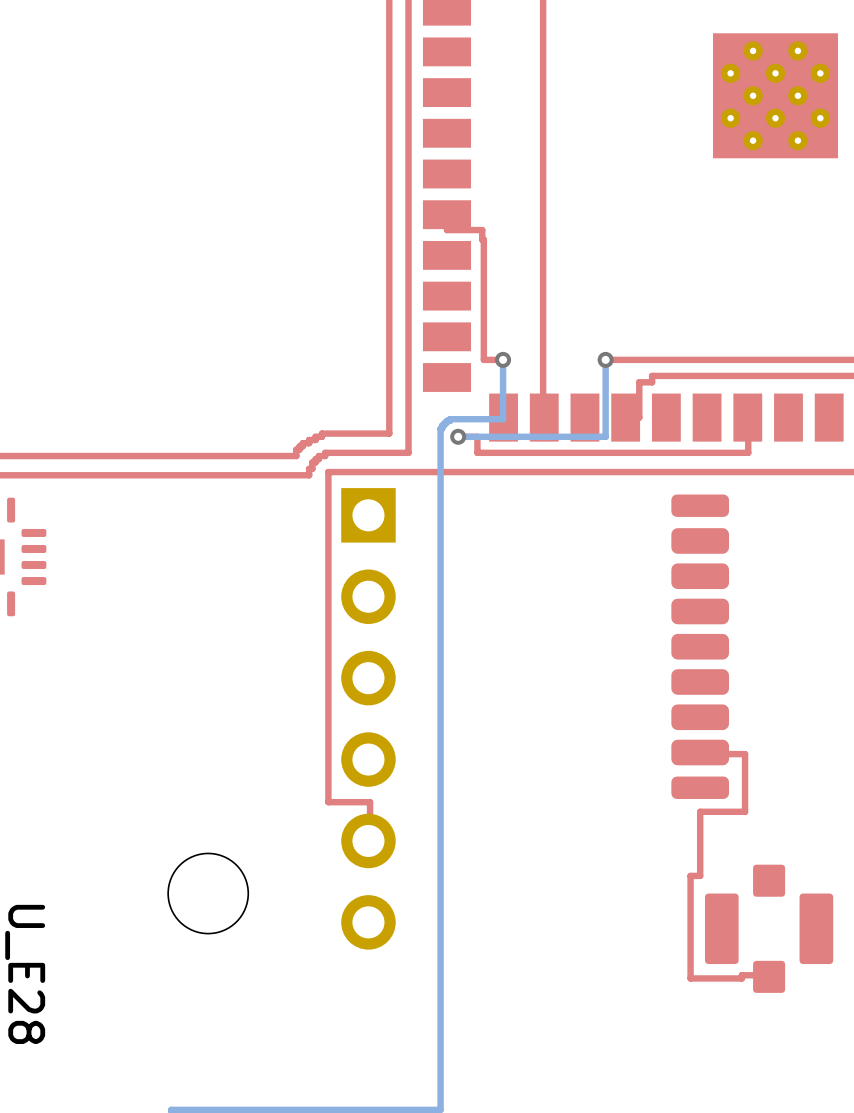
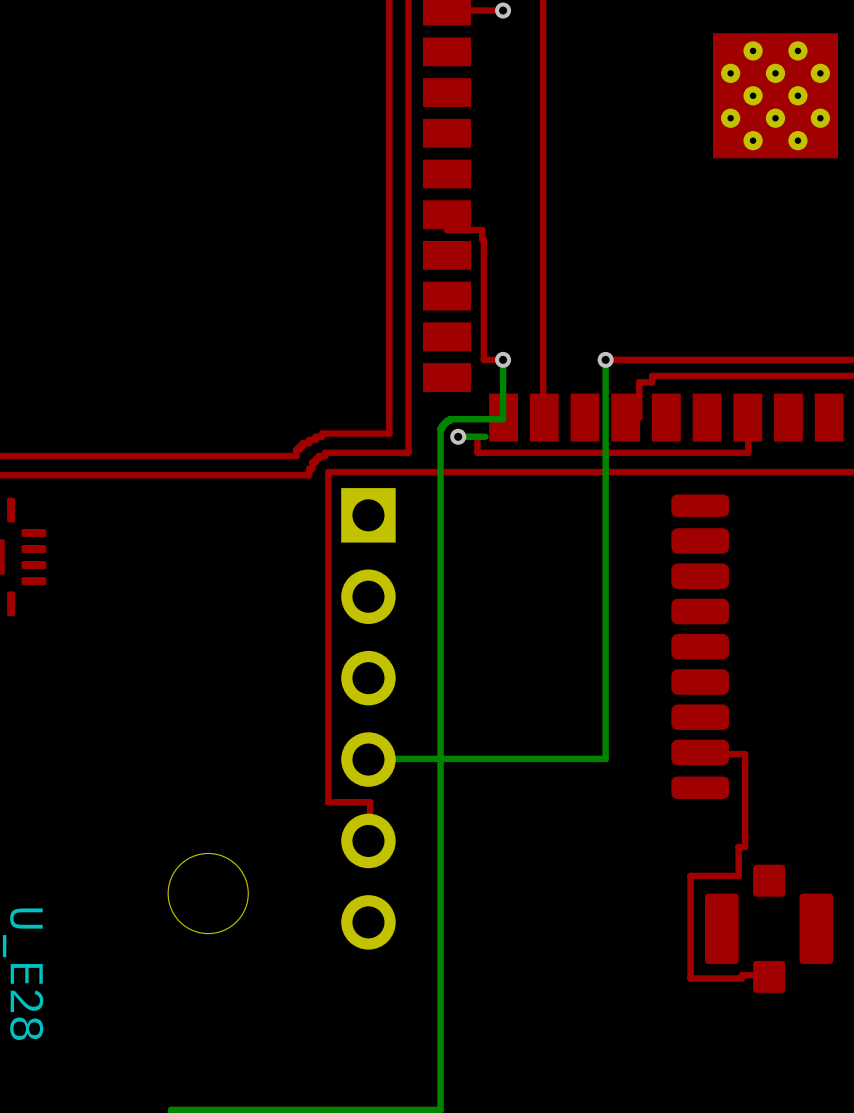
top track: none -> (503, 10) (446, 10)
via: none -> (503, 10)
bottom track: (605, 436) (485, 436) -> (605, 436) (605, 758) (368, 758)
top track: (745, 811) (700, 811) (700, 875) -> (745, 811) (745, 847) (738, 847) (738, 875) (700, 875)

